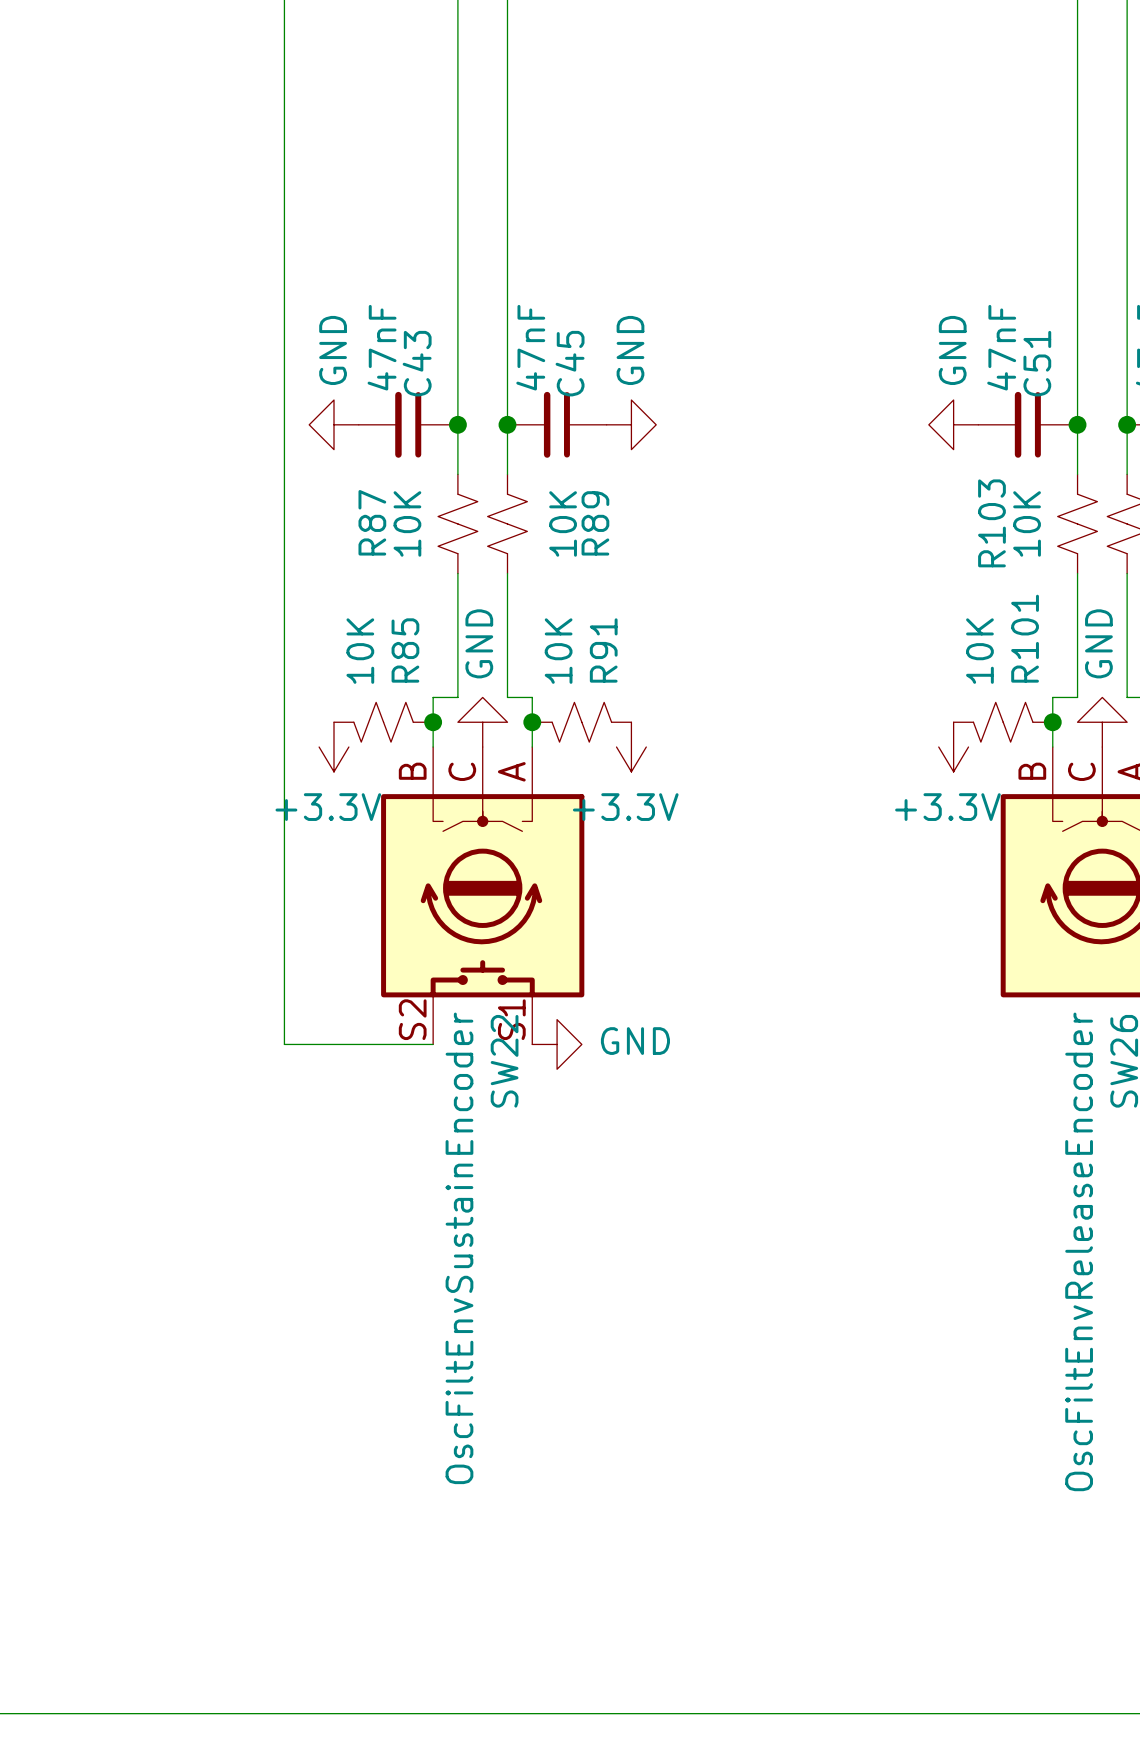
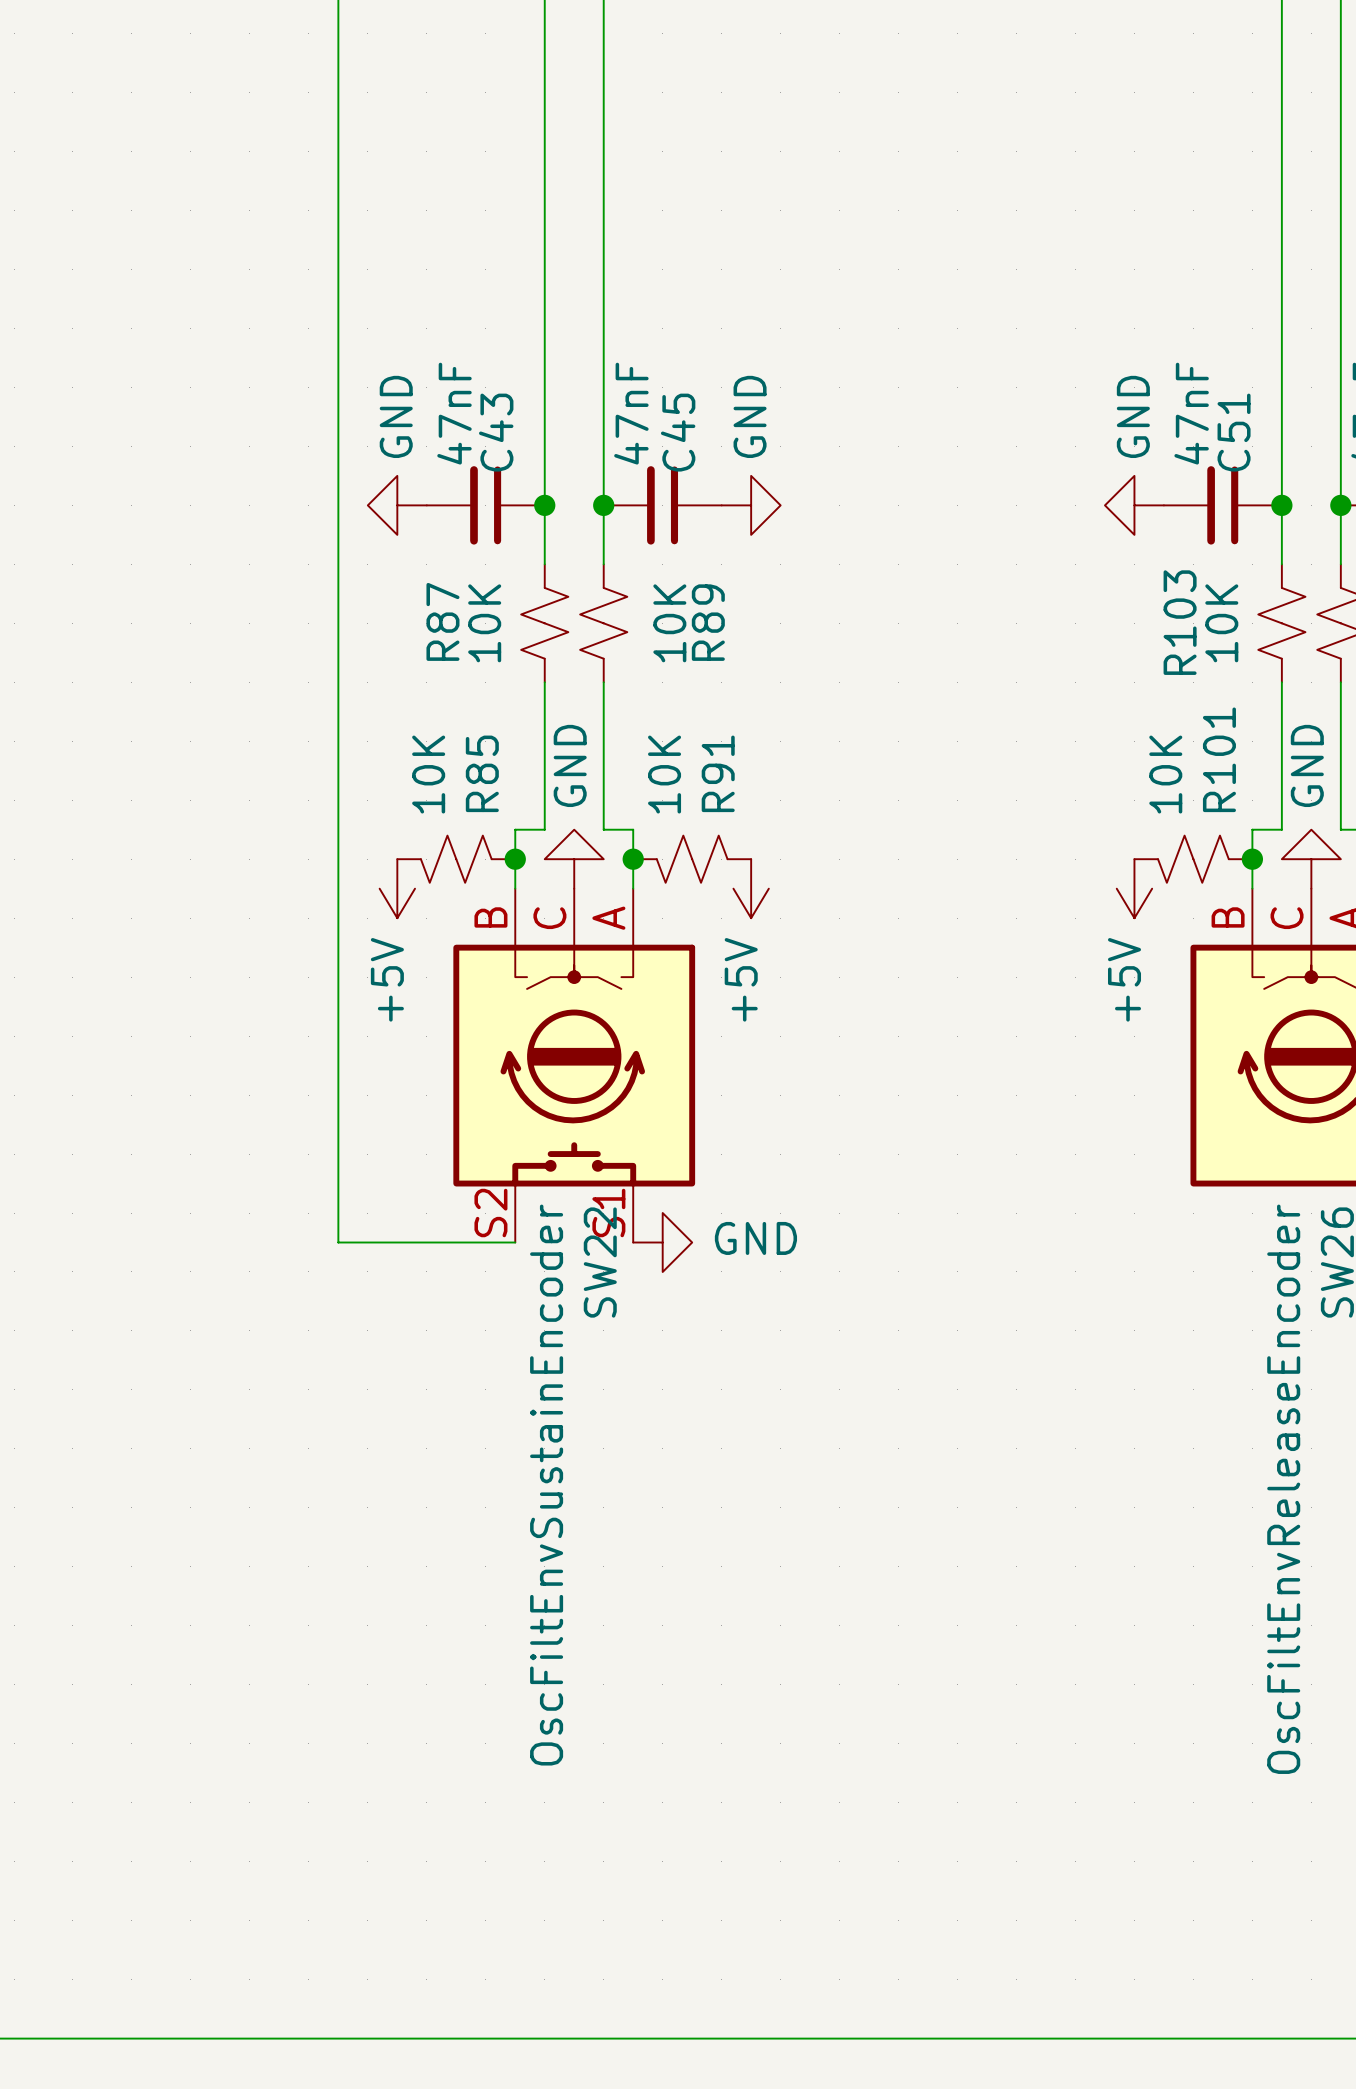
power symbol: +3.3V (333, 747) -> +5V (397, 888)
power symbol: +3.3V (631, 747) -> +5V (751, 888)
power symbol: +3.3V (953, 747) -> +5V (1134, 888)

